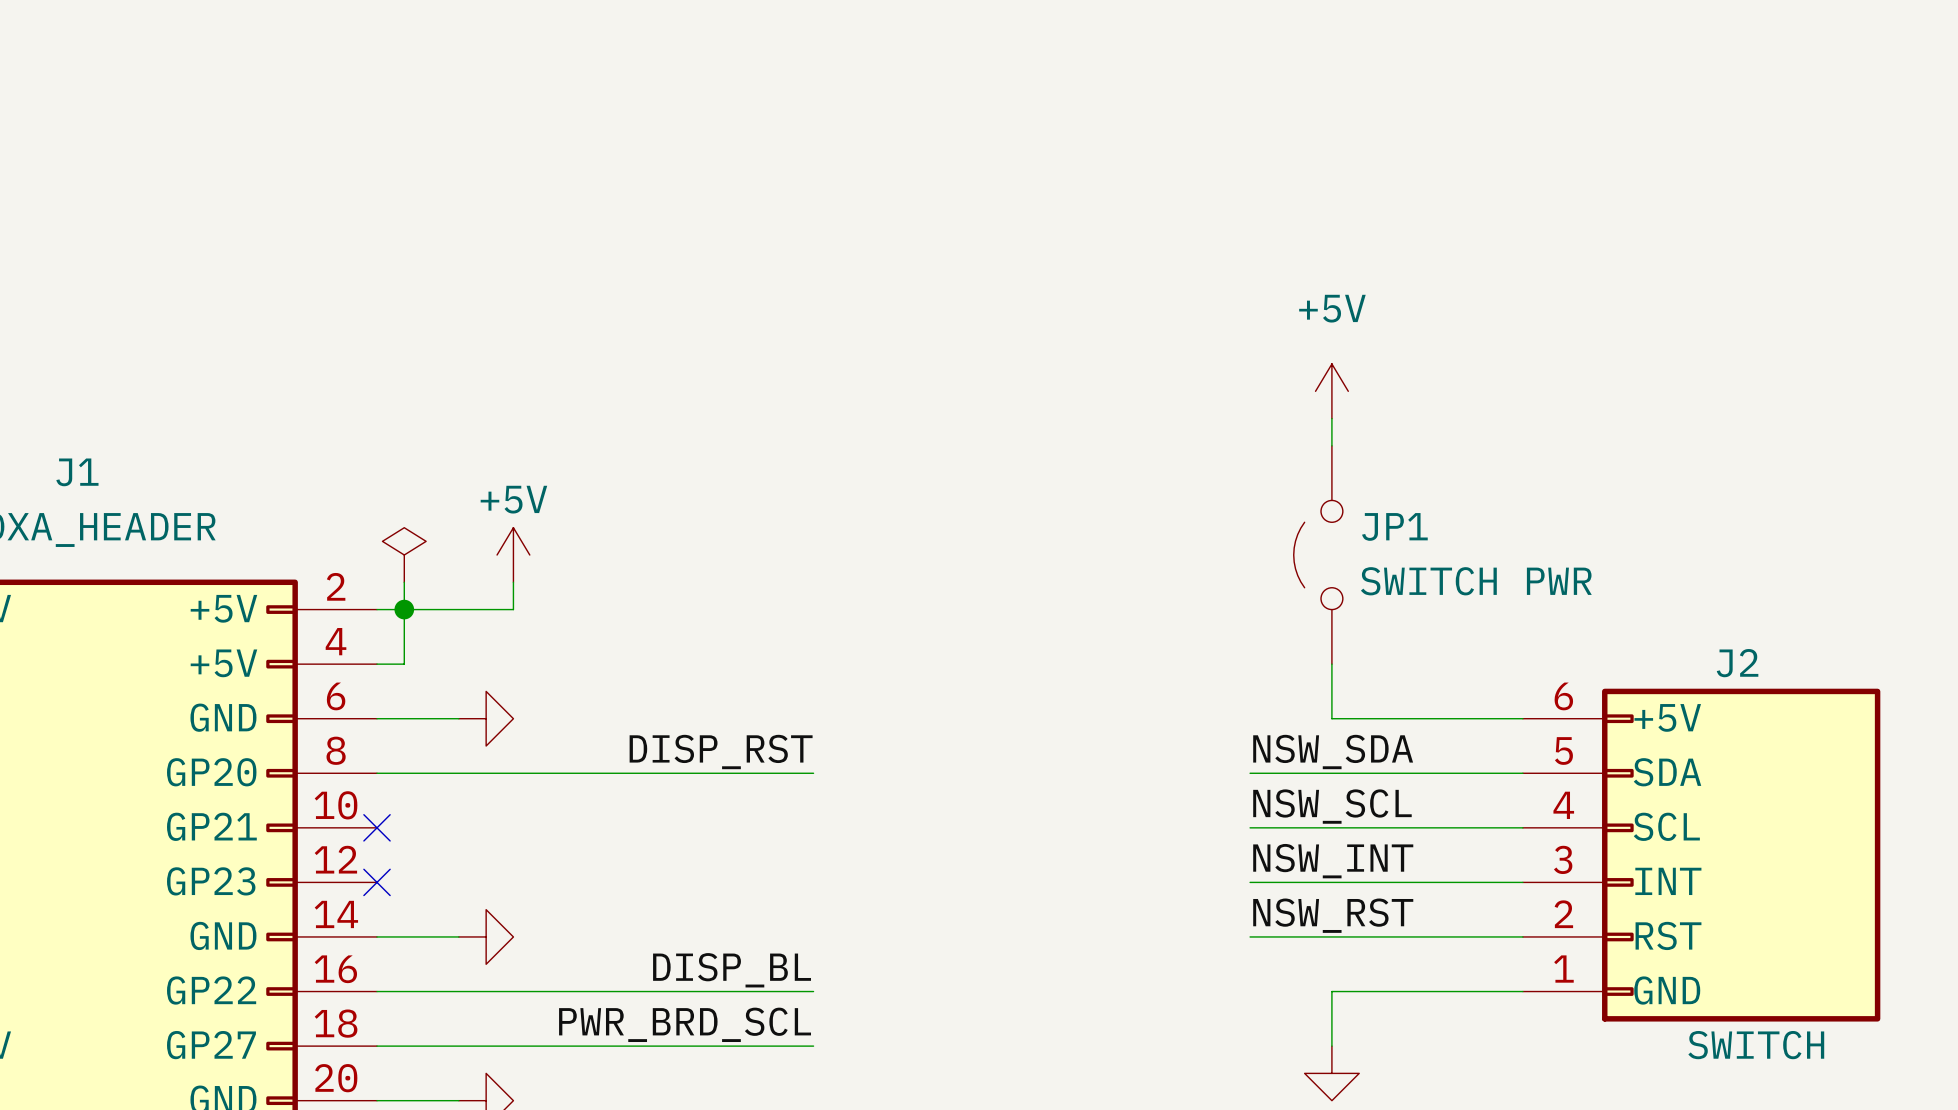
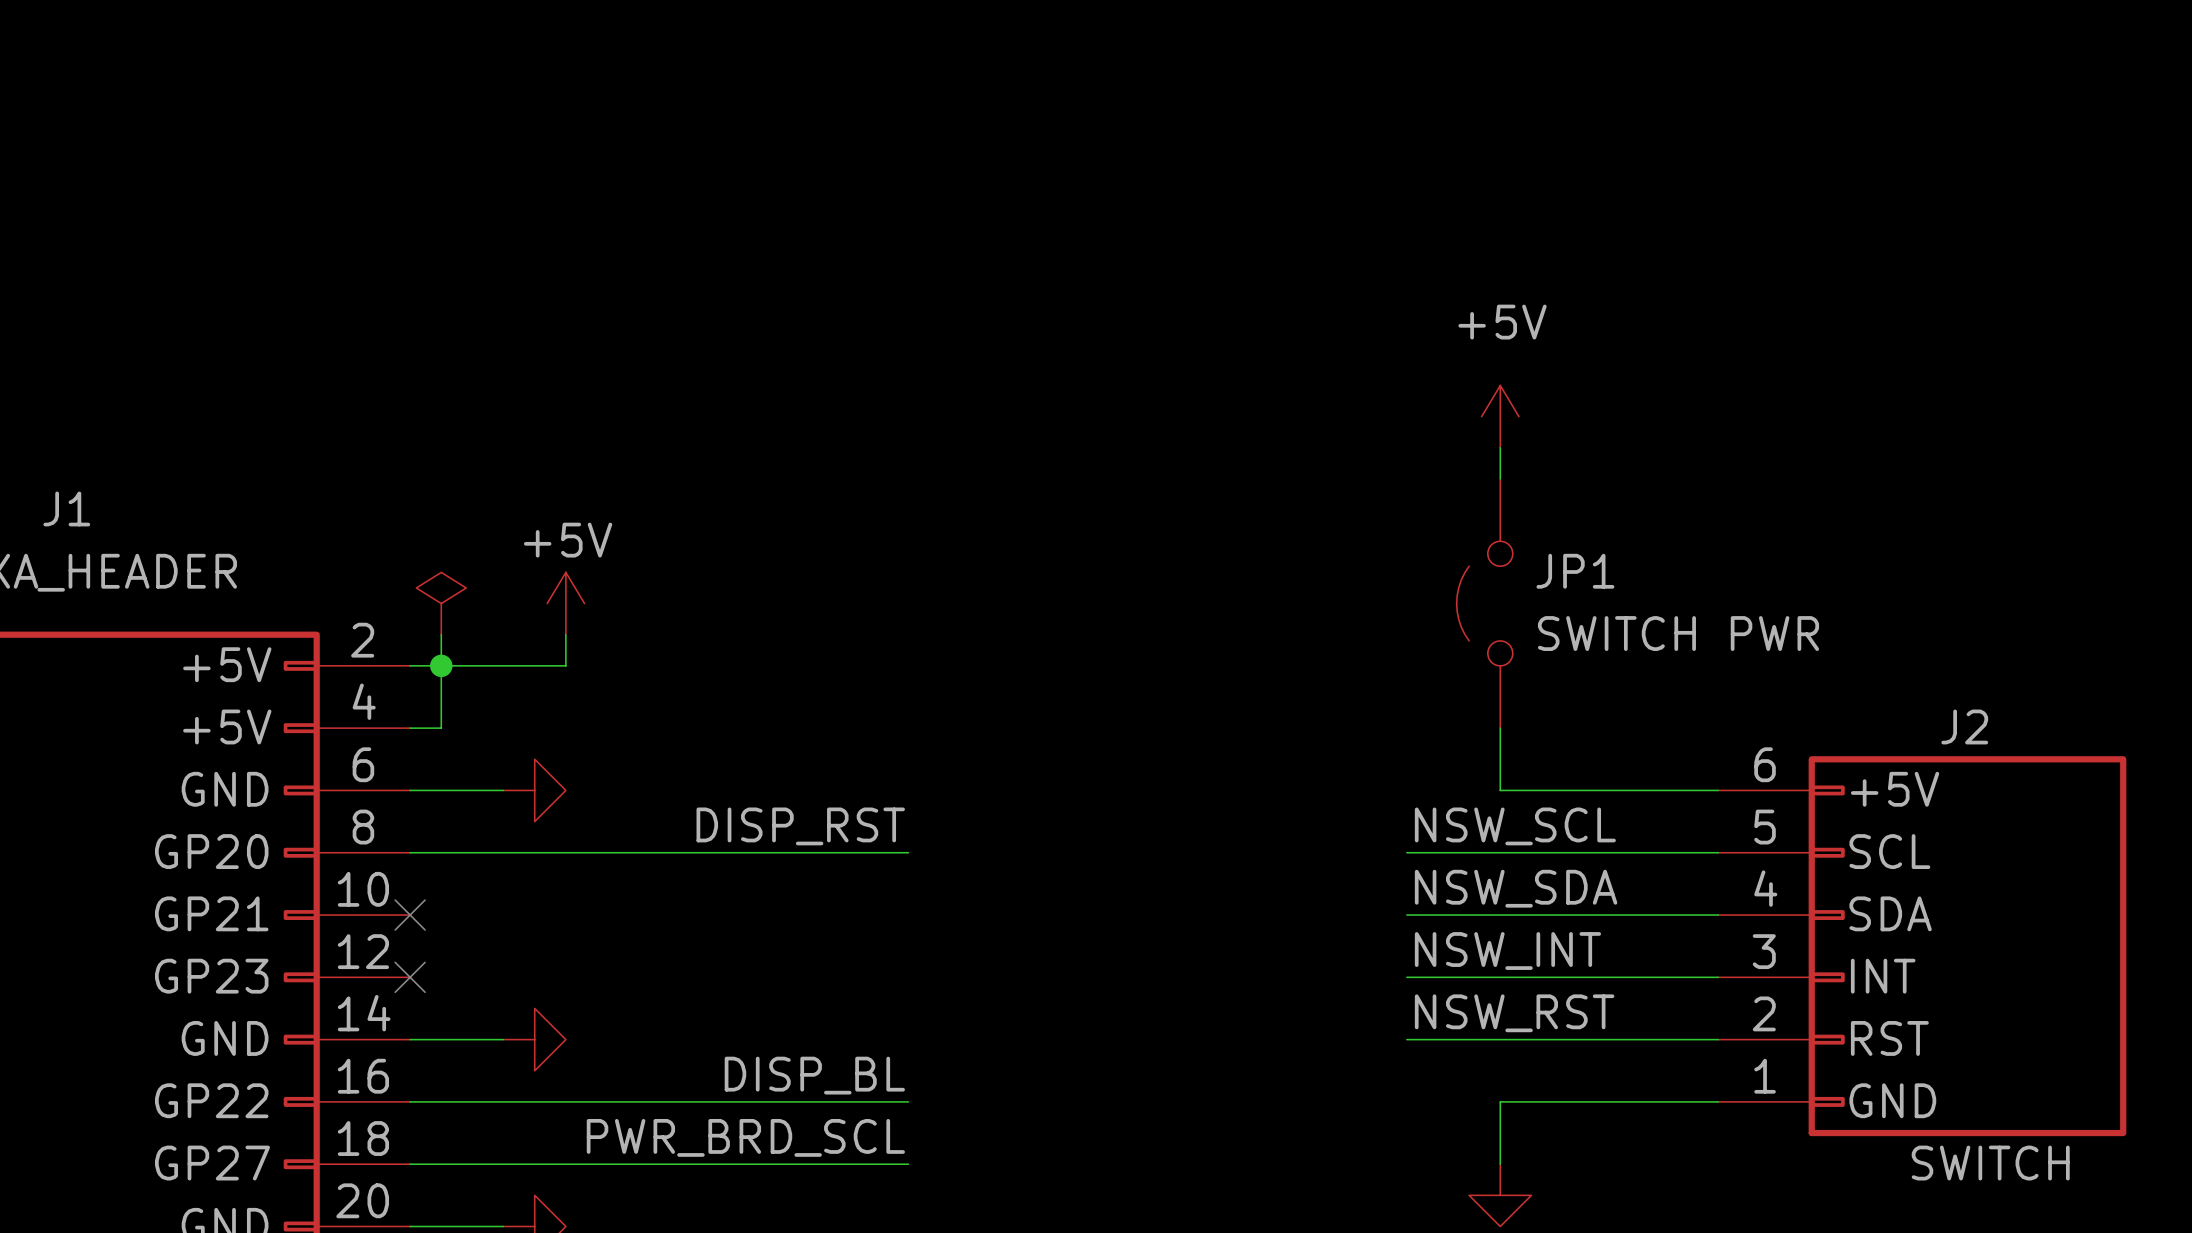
label: NSW_SDA (1333, 752) -> NSW_SCL (1515, 826)
J2 text: SDA (1667, 772) -> SCL (1889, 851)
label: NSW_SCL (1332, 806) -> NSW_SDA (1516, 888)
J2 text: SCL (1666, 826) -> SDA (1890, 913)

